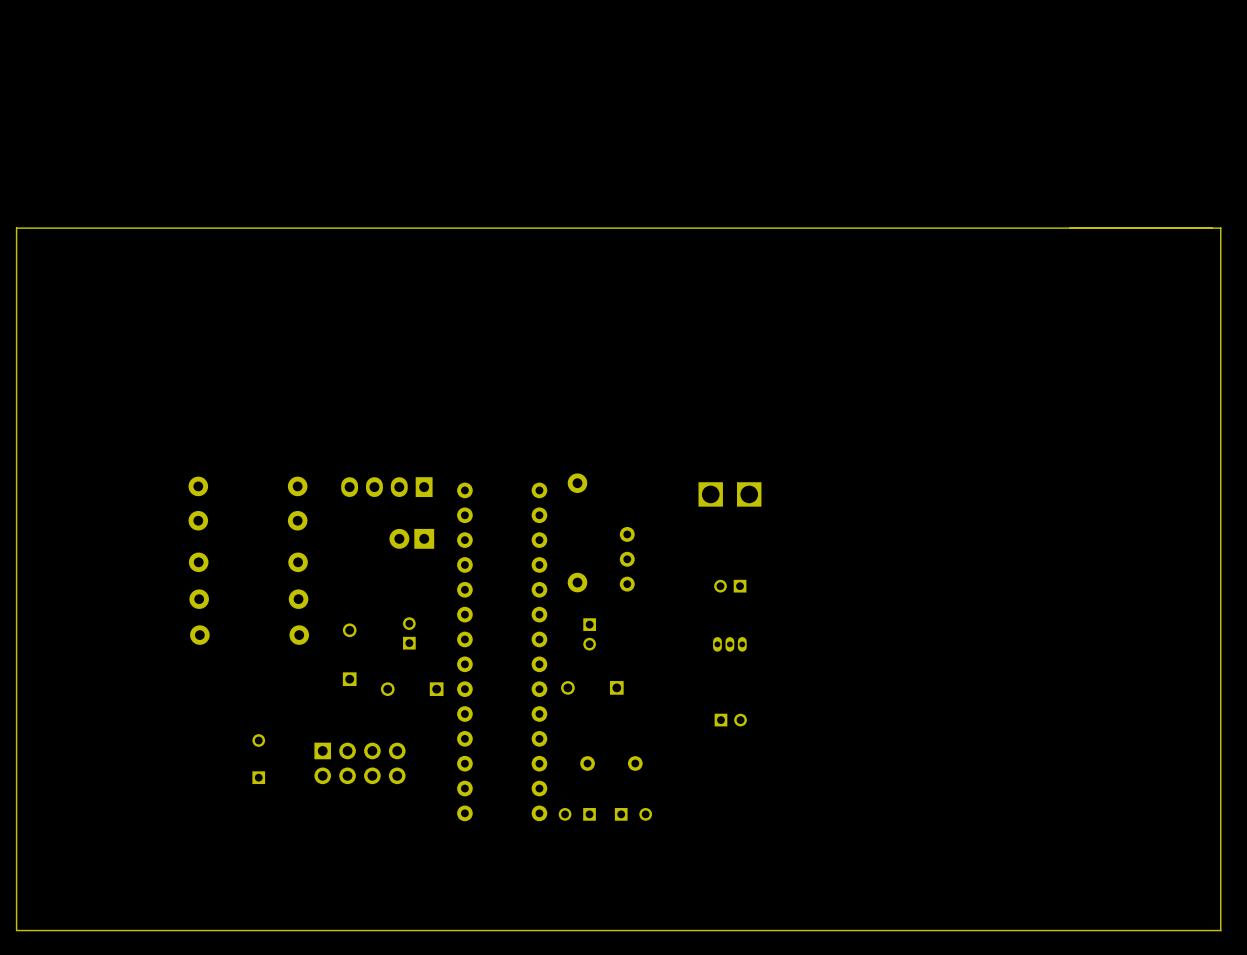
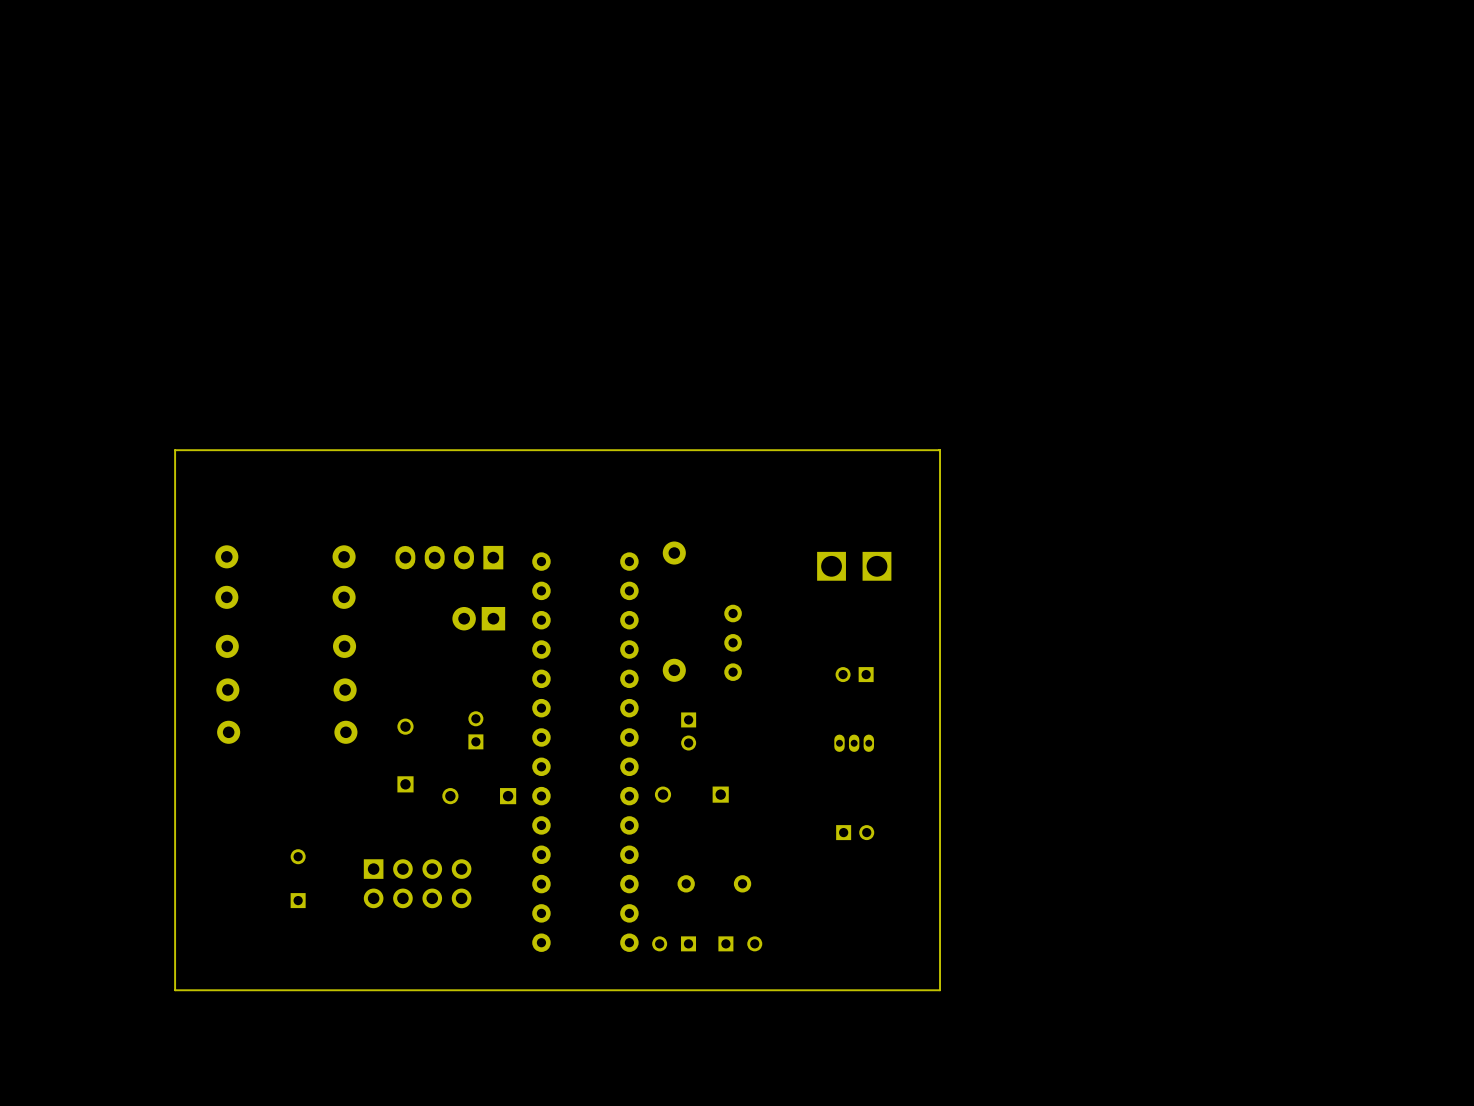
board edge: (1220, 228) (16, 228) (16, 930) (1220, 930) (1220, 228) -> none
board edge: none -> (940, 450) (175, 450) (175, 990) (940, 990) (940, 450)

